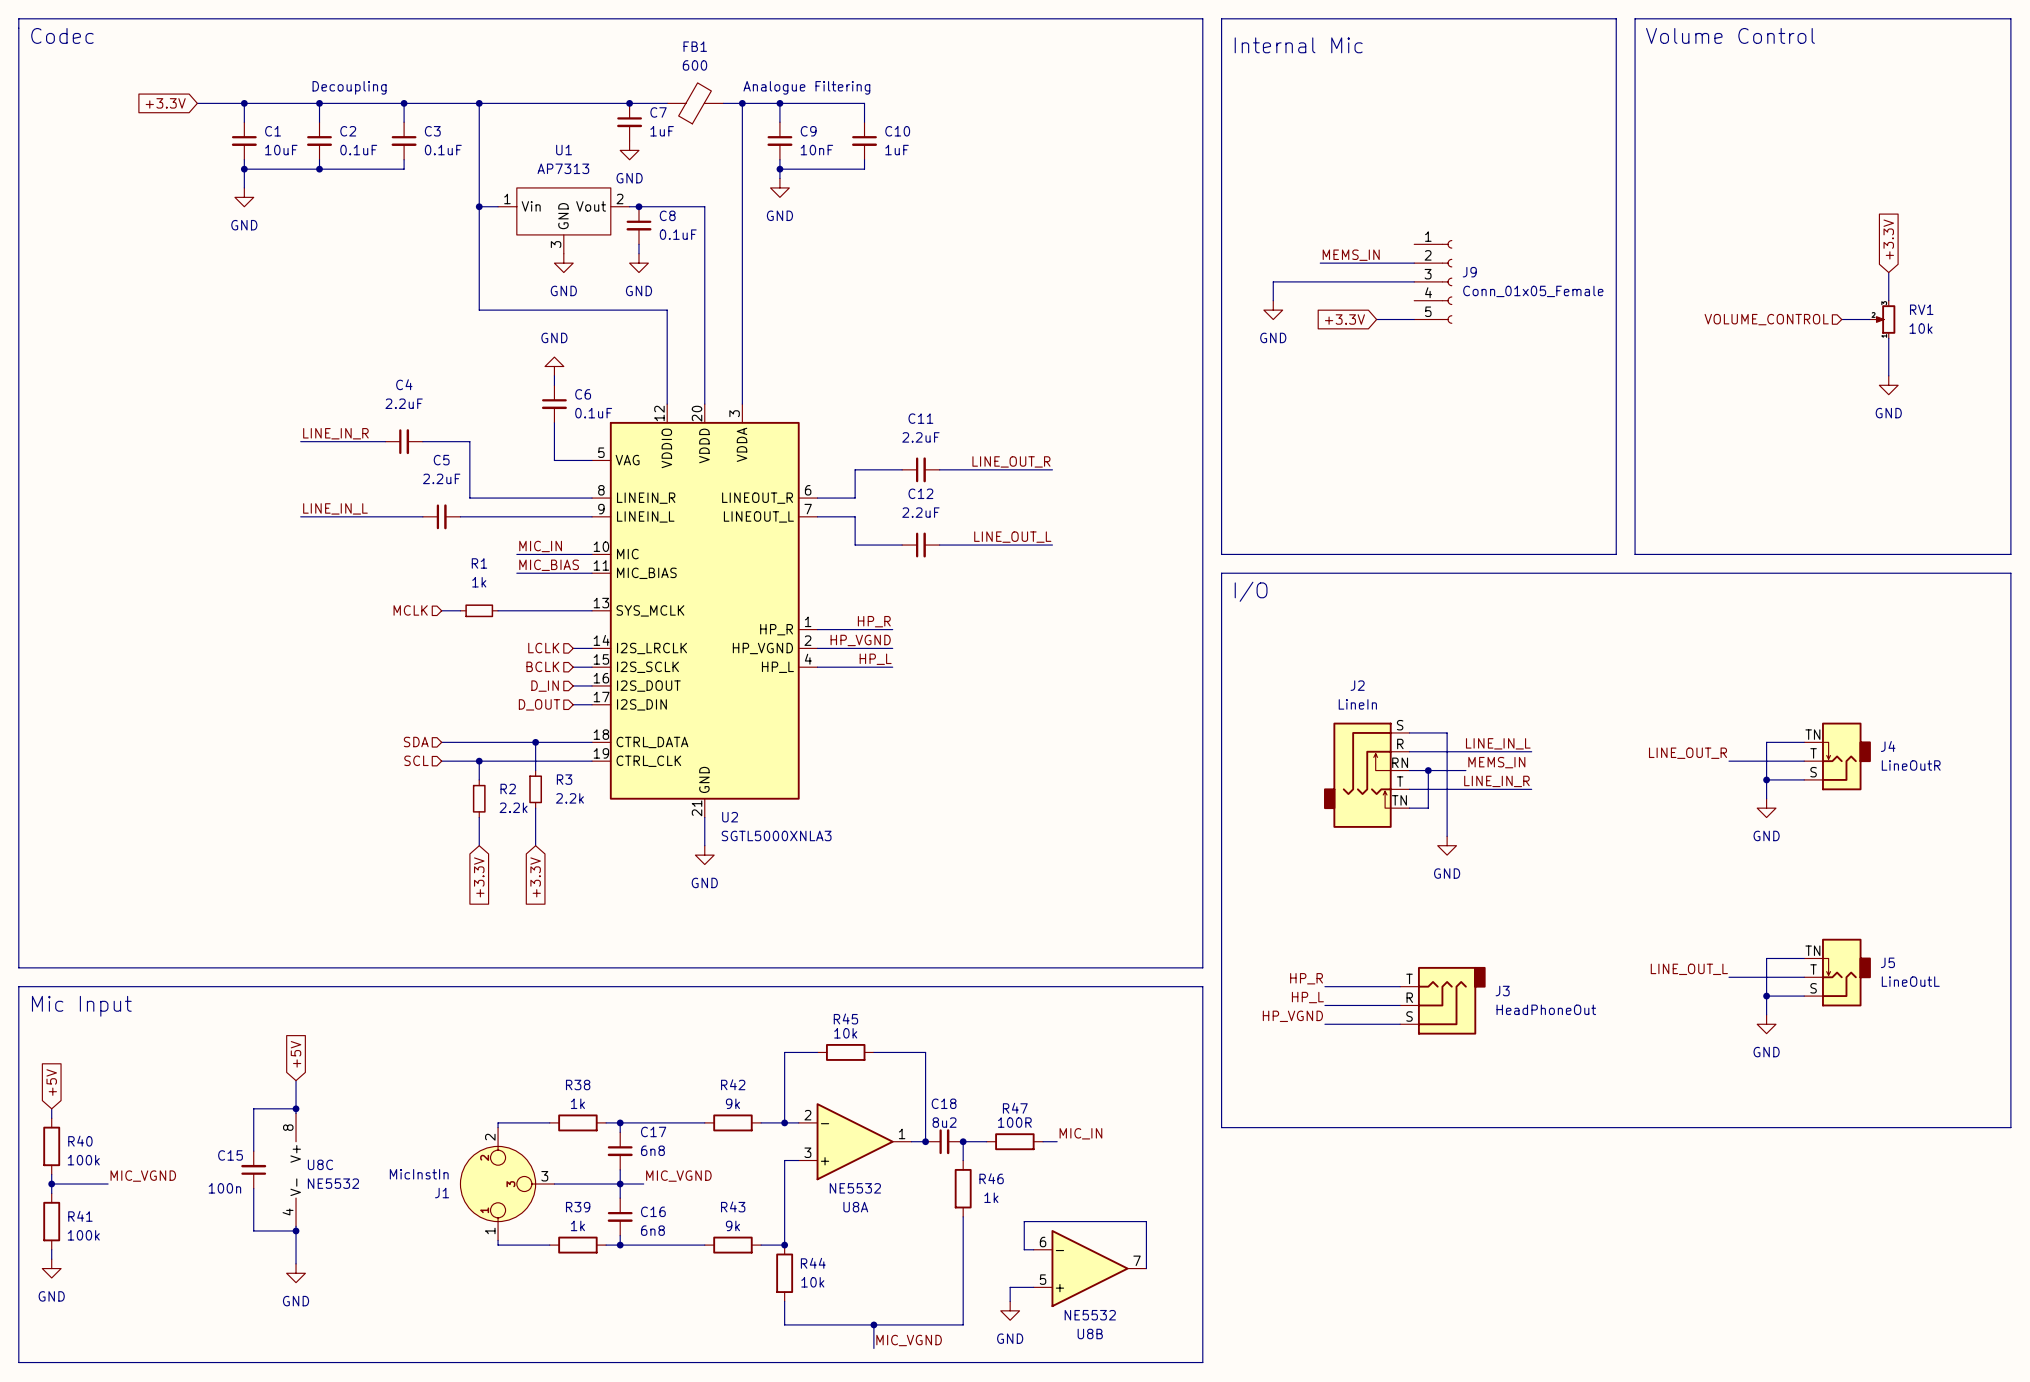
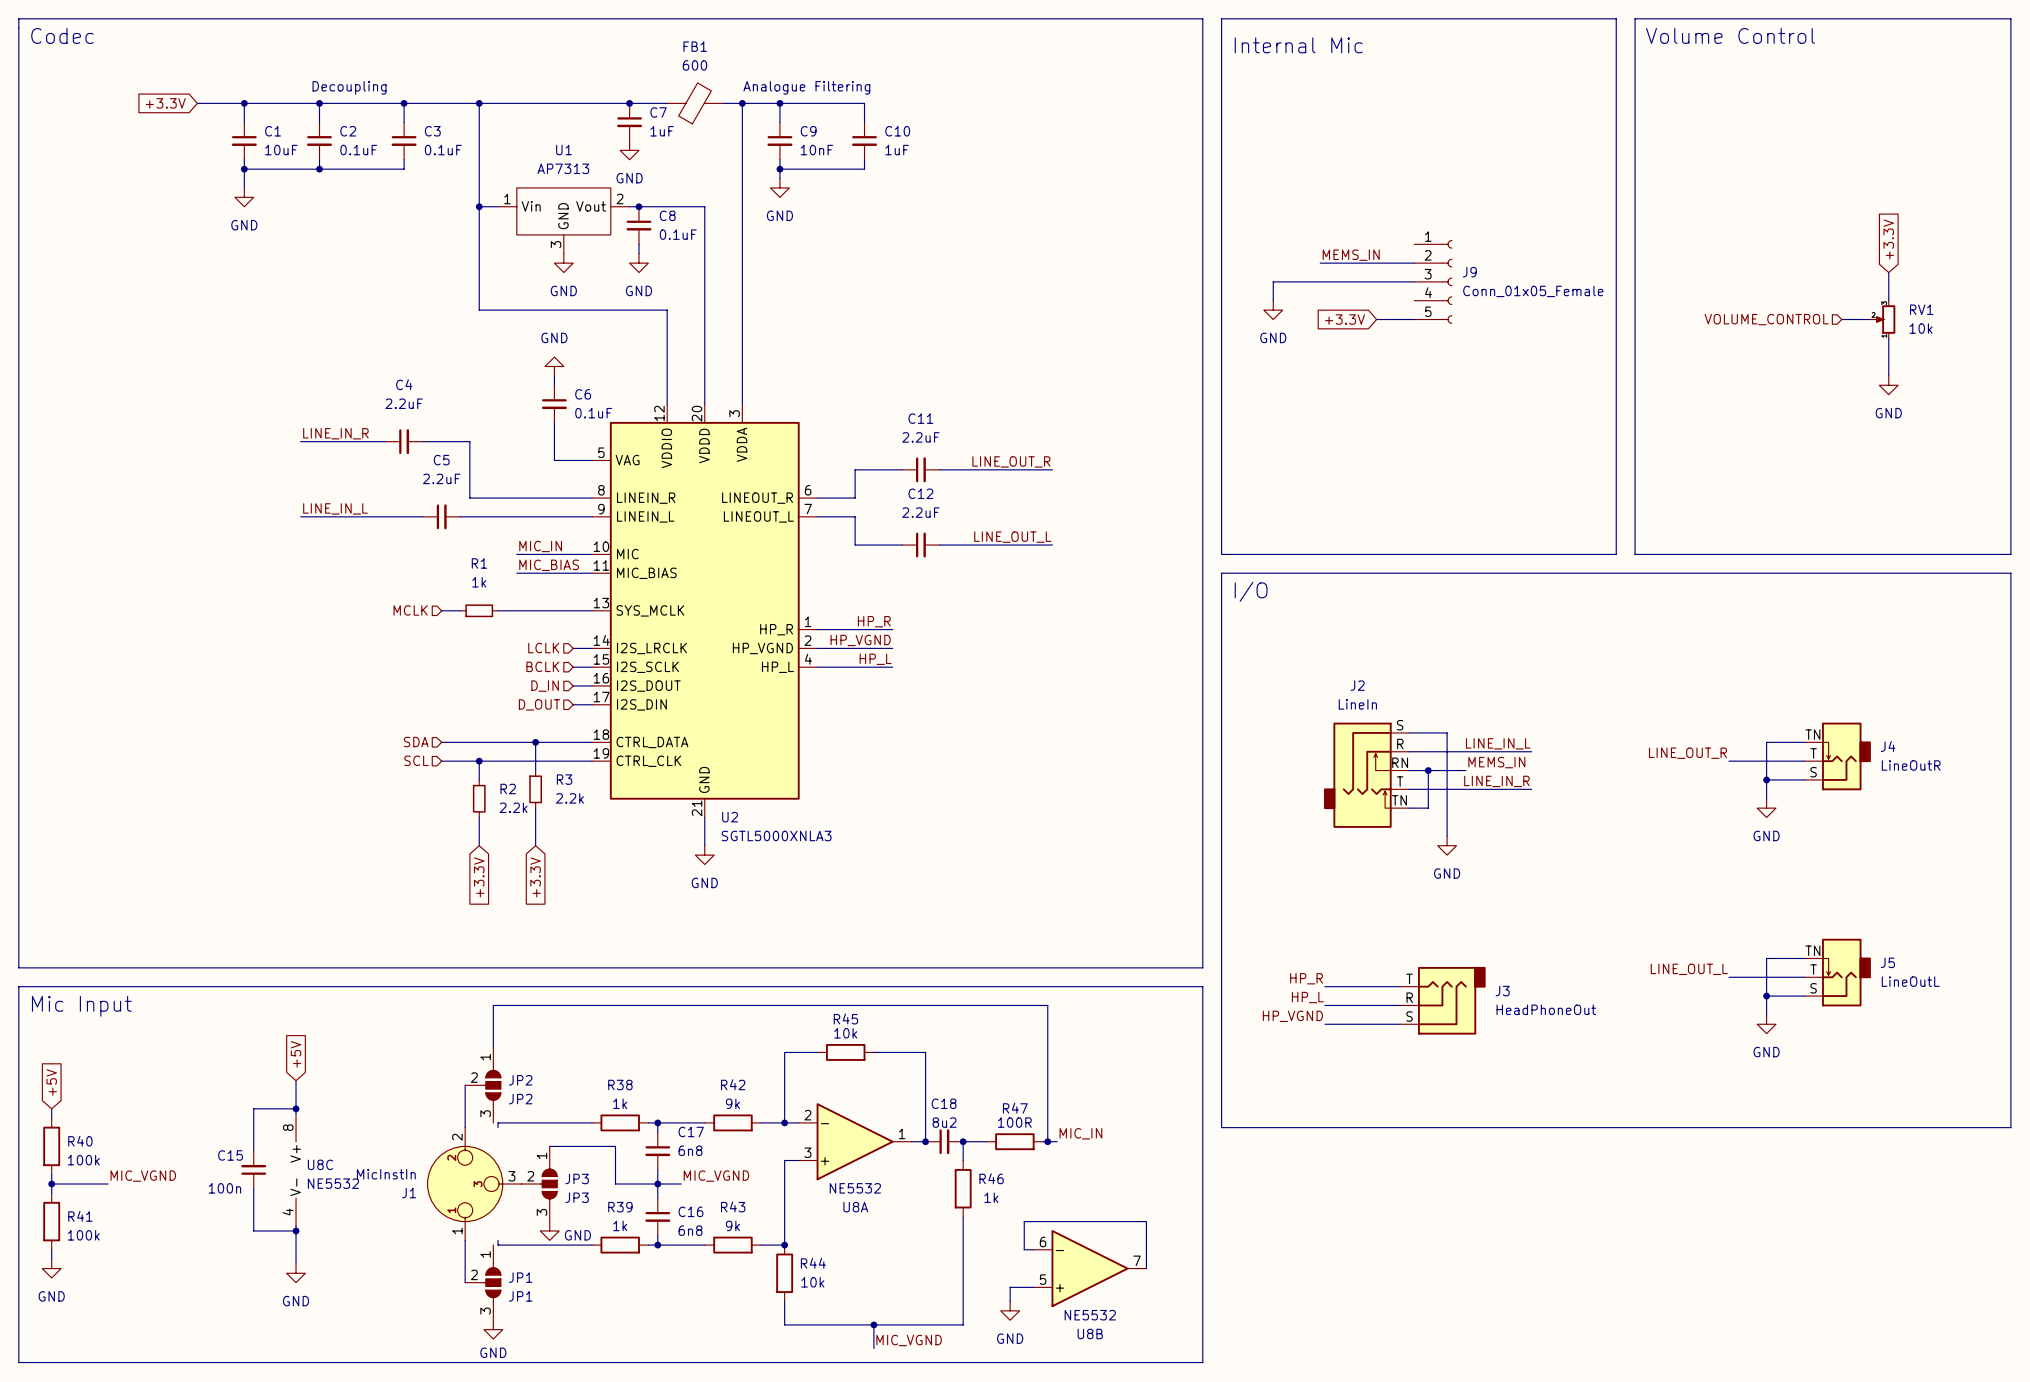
wire: none -> (493, 1047) (493, 1005) (1047, 1005) (1047, 1141)
wire: none -> (465, 1085) (465, 1127)
JP2: none -> JP2 (483, 1085)
R38 position: (577, 1122) -> (620, 1122)
wire: (606, 1122) (648, 1122) -> (549, 1122) (592, 1122)
wire: (620, 1122) (620, 1132) -> (657, 1122) (657, 1132)
junction: (620, 1122) -> none
junction: none -> (657, 1122)
junction: none -> (1047, 1141)
C17 position: (620, 1151) -> (657, 1151)
wire: (620, 1169) (620, 1198) -> (657, 1169) (657, 1198)
label position: MIC_VGND (678, 1176) -> MIC_VGND (716, 1176)
J1 position: (507, 1184) -> (474, 1184)
JP3: none -> JP3 (539, 1184)
wire: (554, 1184) (615, 1184) -> (549, 1146) (615, 1146) (615, 1184)
junction: (620, 1184) -> none
wire: none -> (643, 1184) (681, 1184)
junction: none -> (657, 1184)
C16 position: (620, 1216) -> (657, 1216)
power symbol: none -> GND (549, 1230)
wire: (620, 1235) (620, 1245) -> (657, 1235) (657, 1245)
wire: none -> (465, 1240) (465, 1282)
R39 position: (577, 1245) -> (620, 1245)
wire: (606, 1245) (648, 1245) -> (549, 1245) (592, 1245)
junction: (620, 1245) -> none
junction: none -> (657, 1245)
JP1: none -> JP1 (483, 1282)
power symbol: none -> GND (493, 1329)

